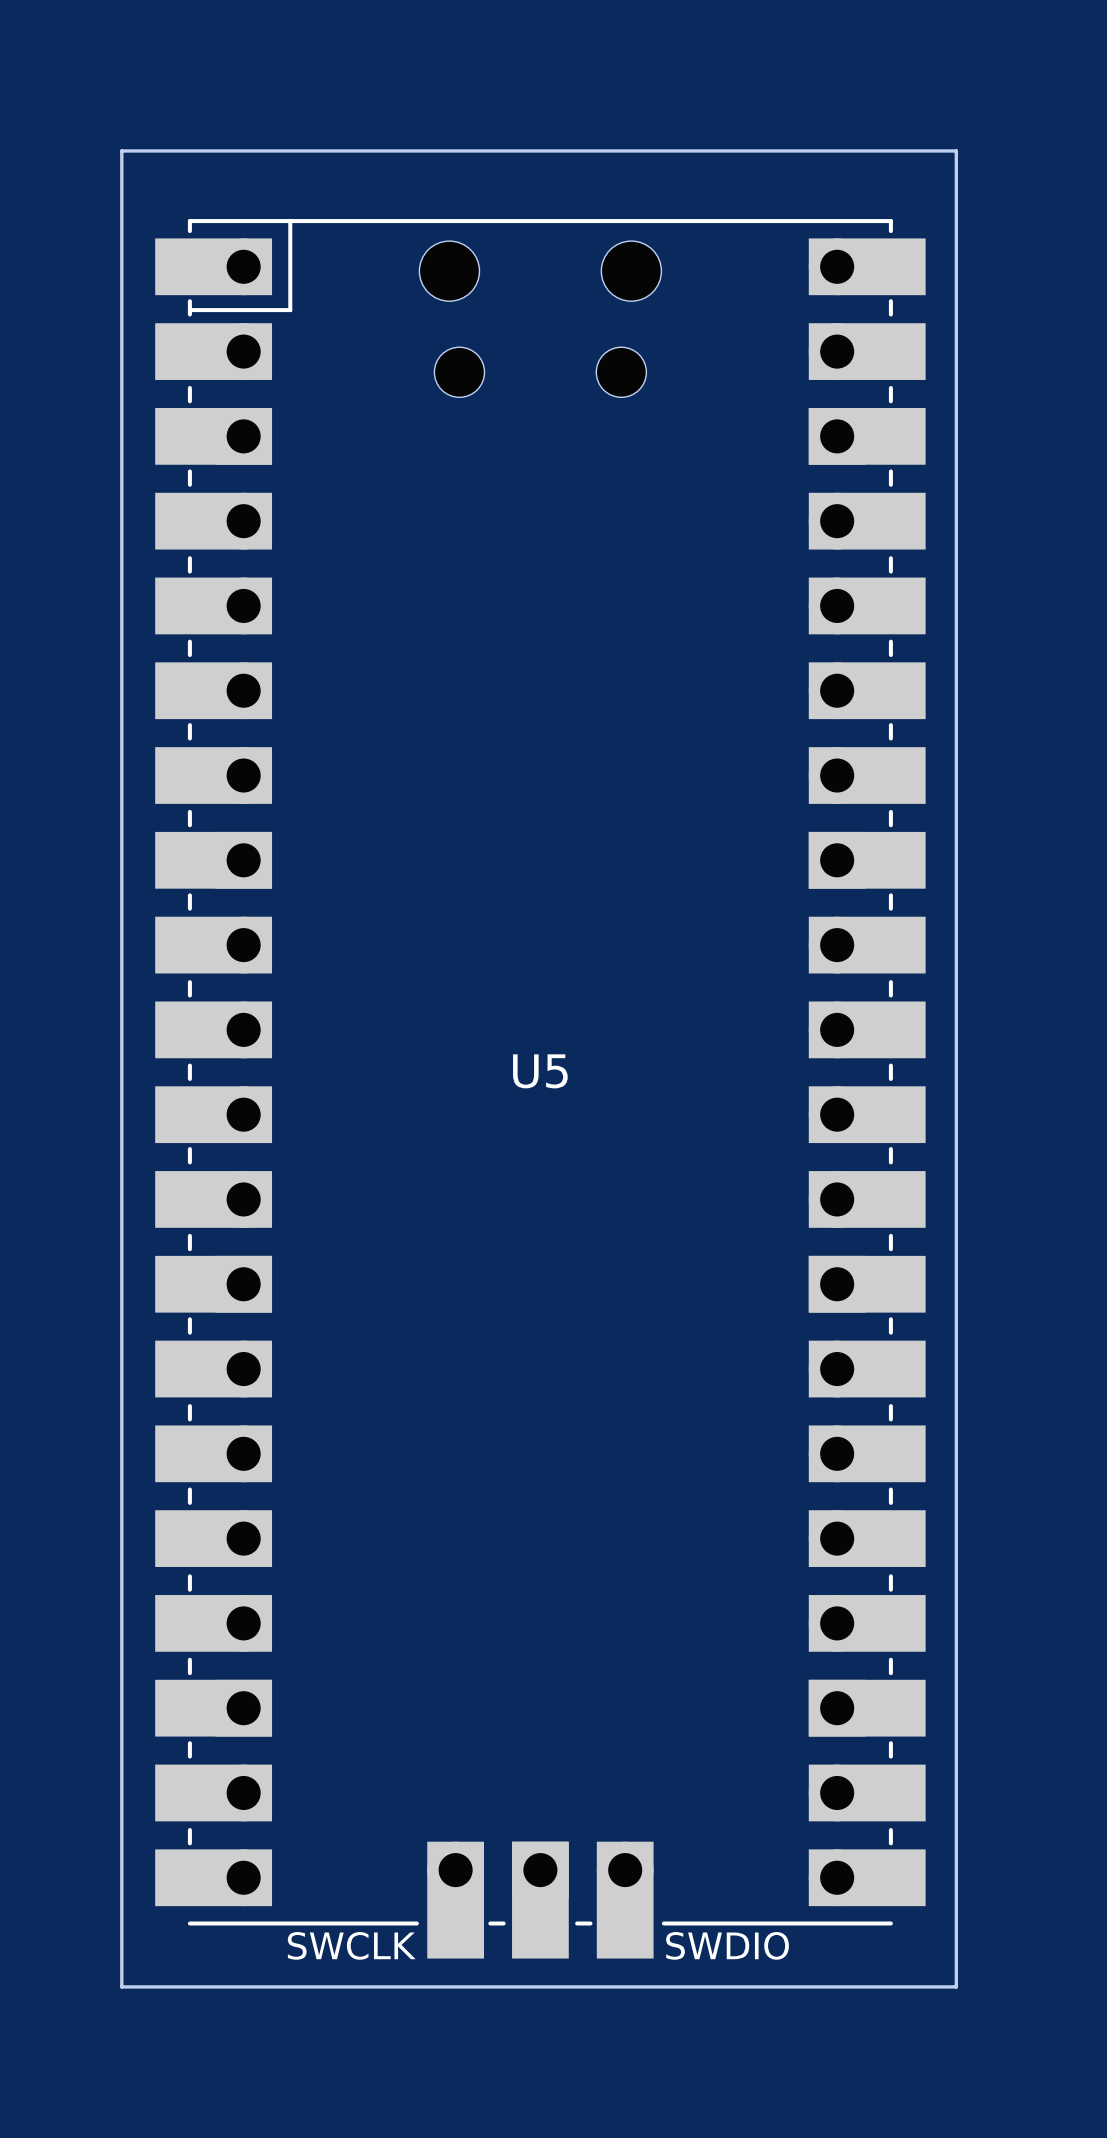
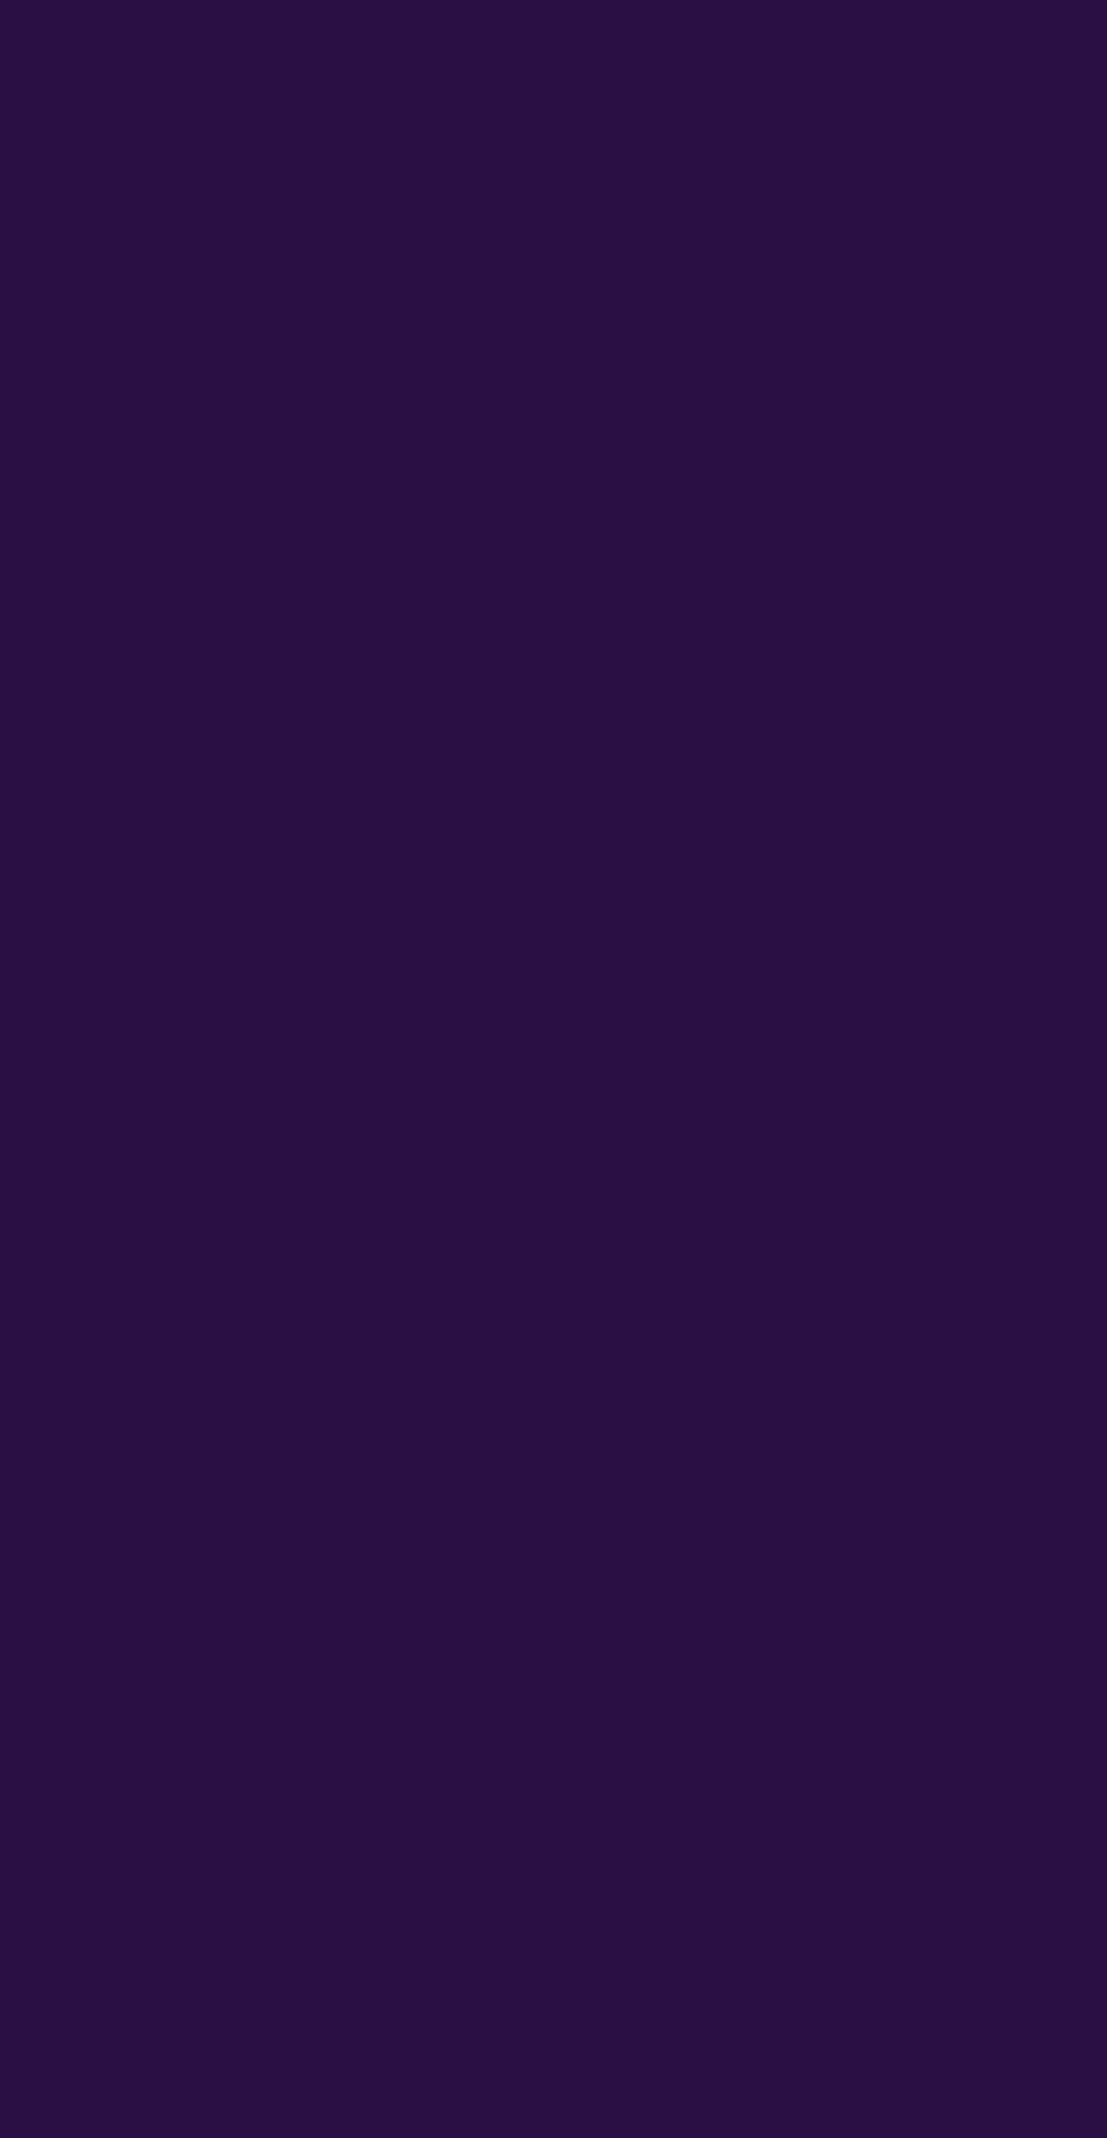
board edge: (121, 150) (956, 150) (956, 1986) (121, 1986) (121, 150) -> none
U5: (540, 1088) -> none

